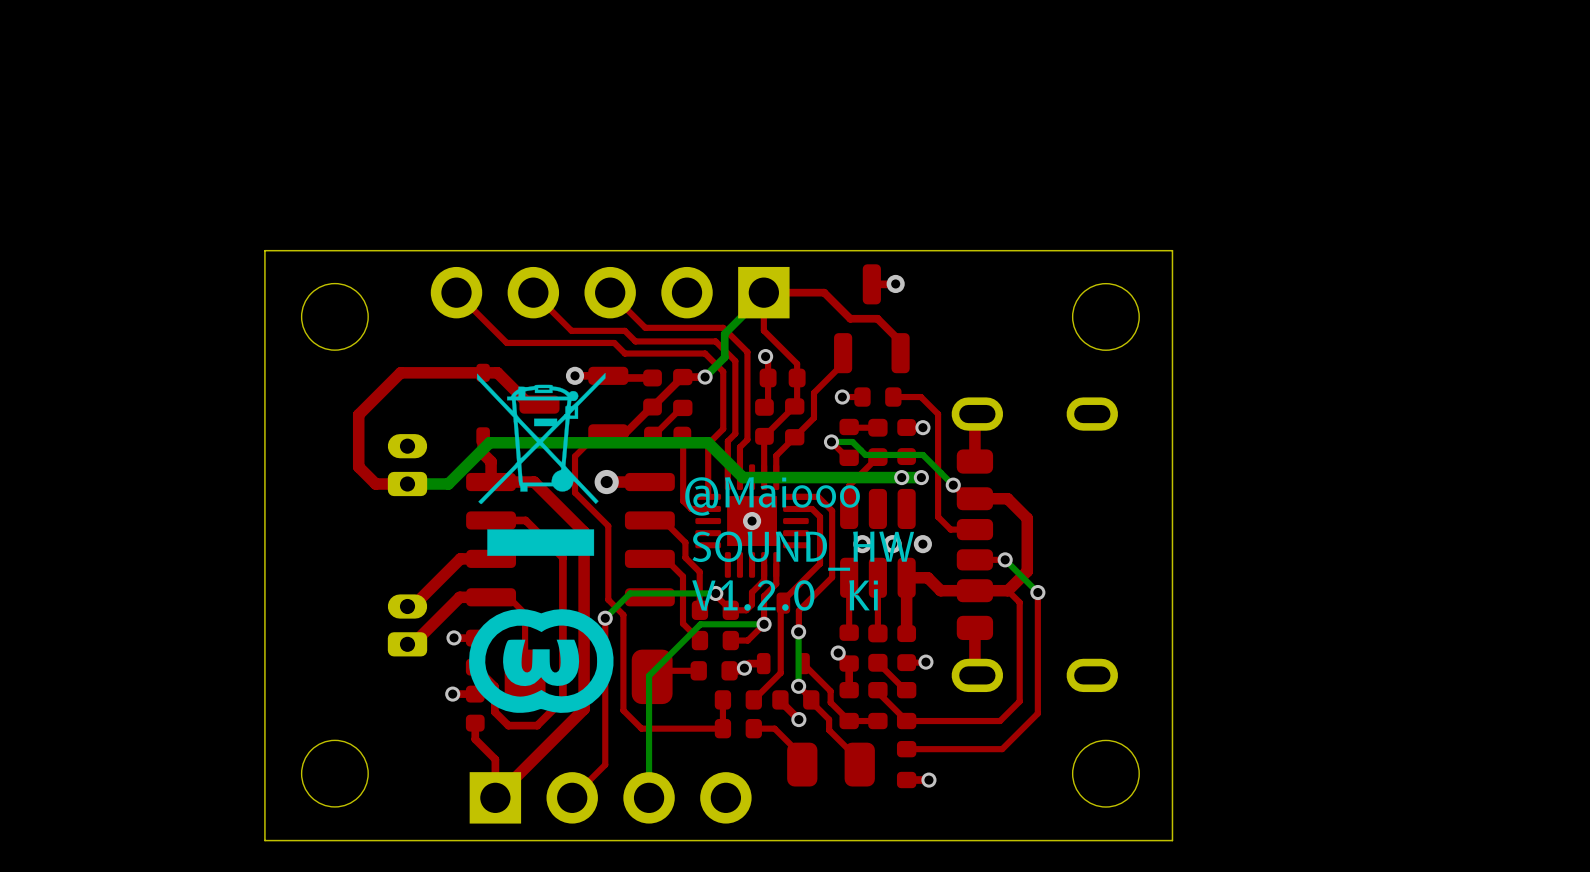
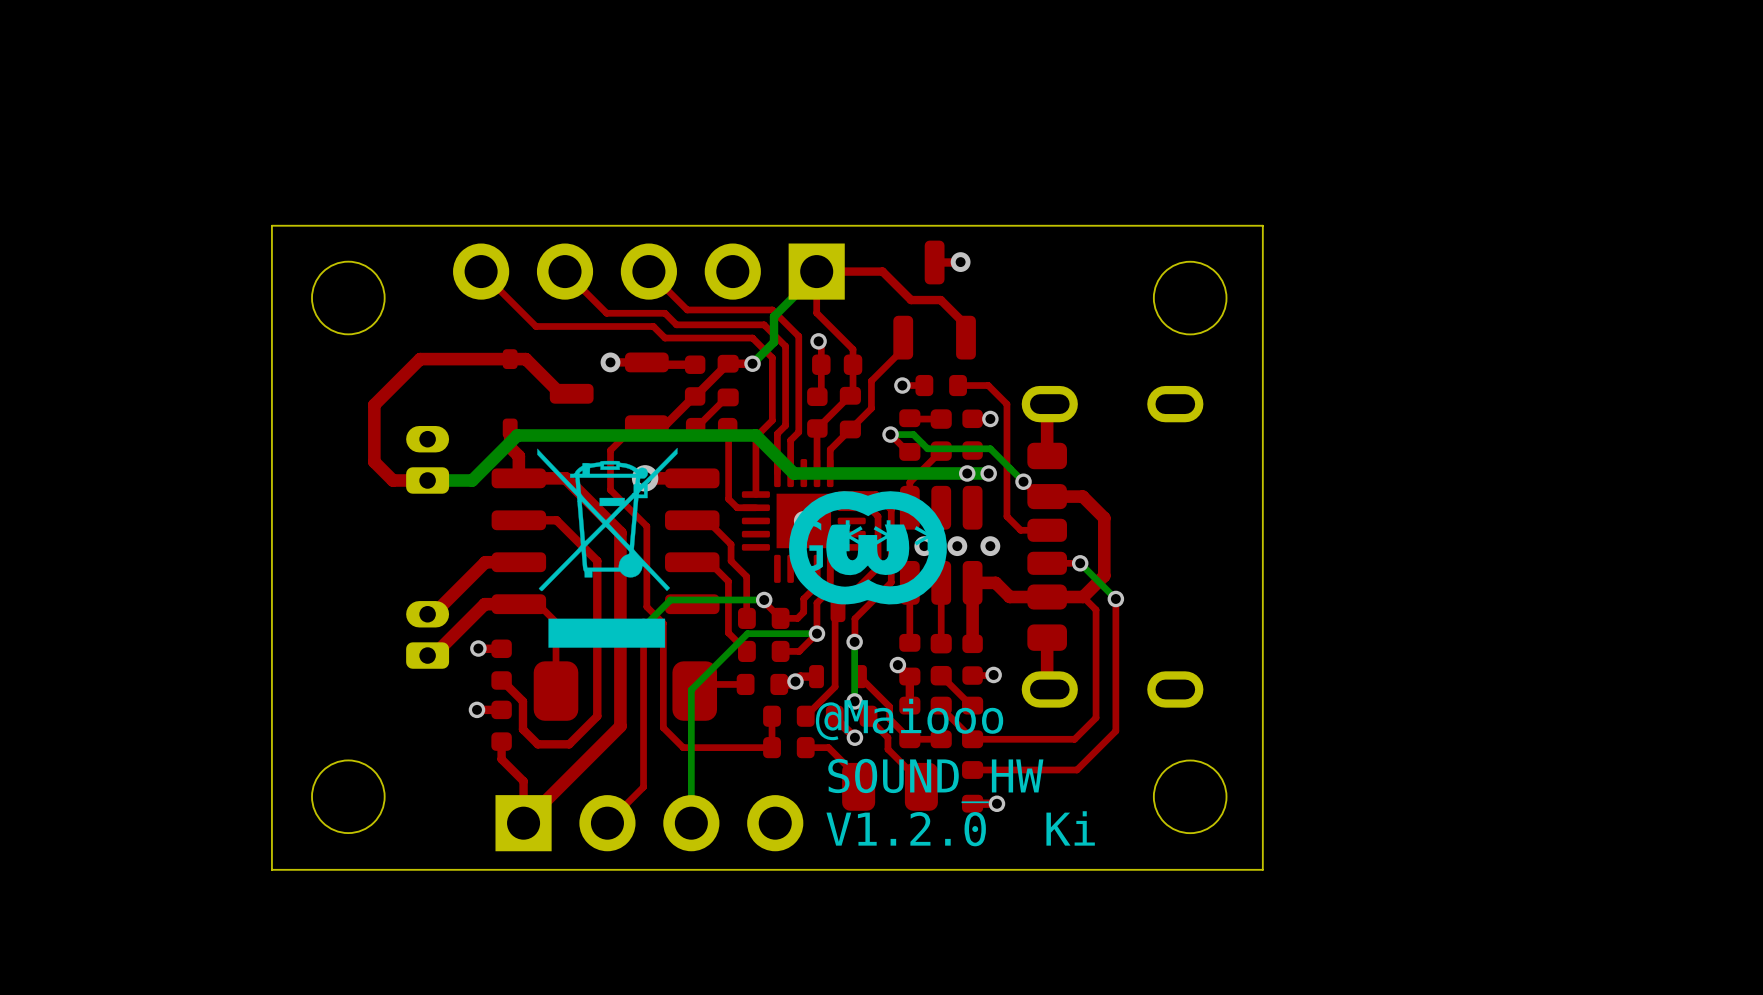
drawing position: (541, 464) -> (607, 547)
text position: @Maiooo (772, 496) -> @Maiooo (909, 719)
part: none -> (867, 547)
text position: SOUND_HW (803, 551) -> SOUND_HW (935, 780)
text position: V1.2.0 Ki (785, 595) -> V1.2.0 Ki (960, 828)
drawing: [469, 609, 614, 713] -> none

